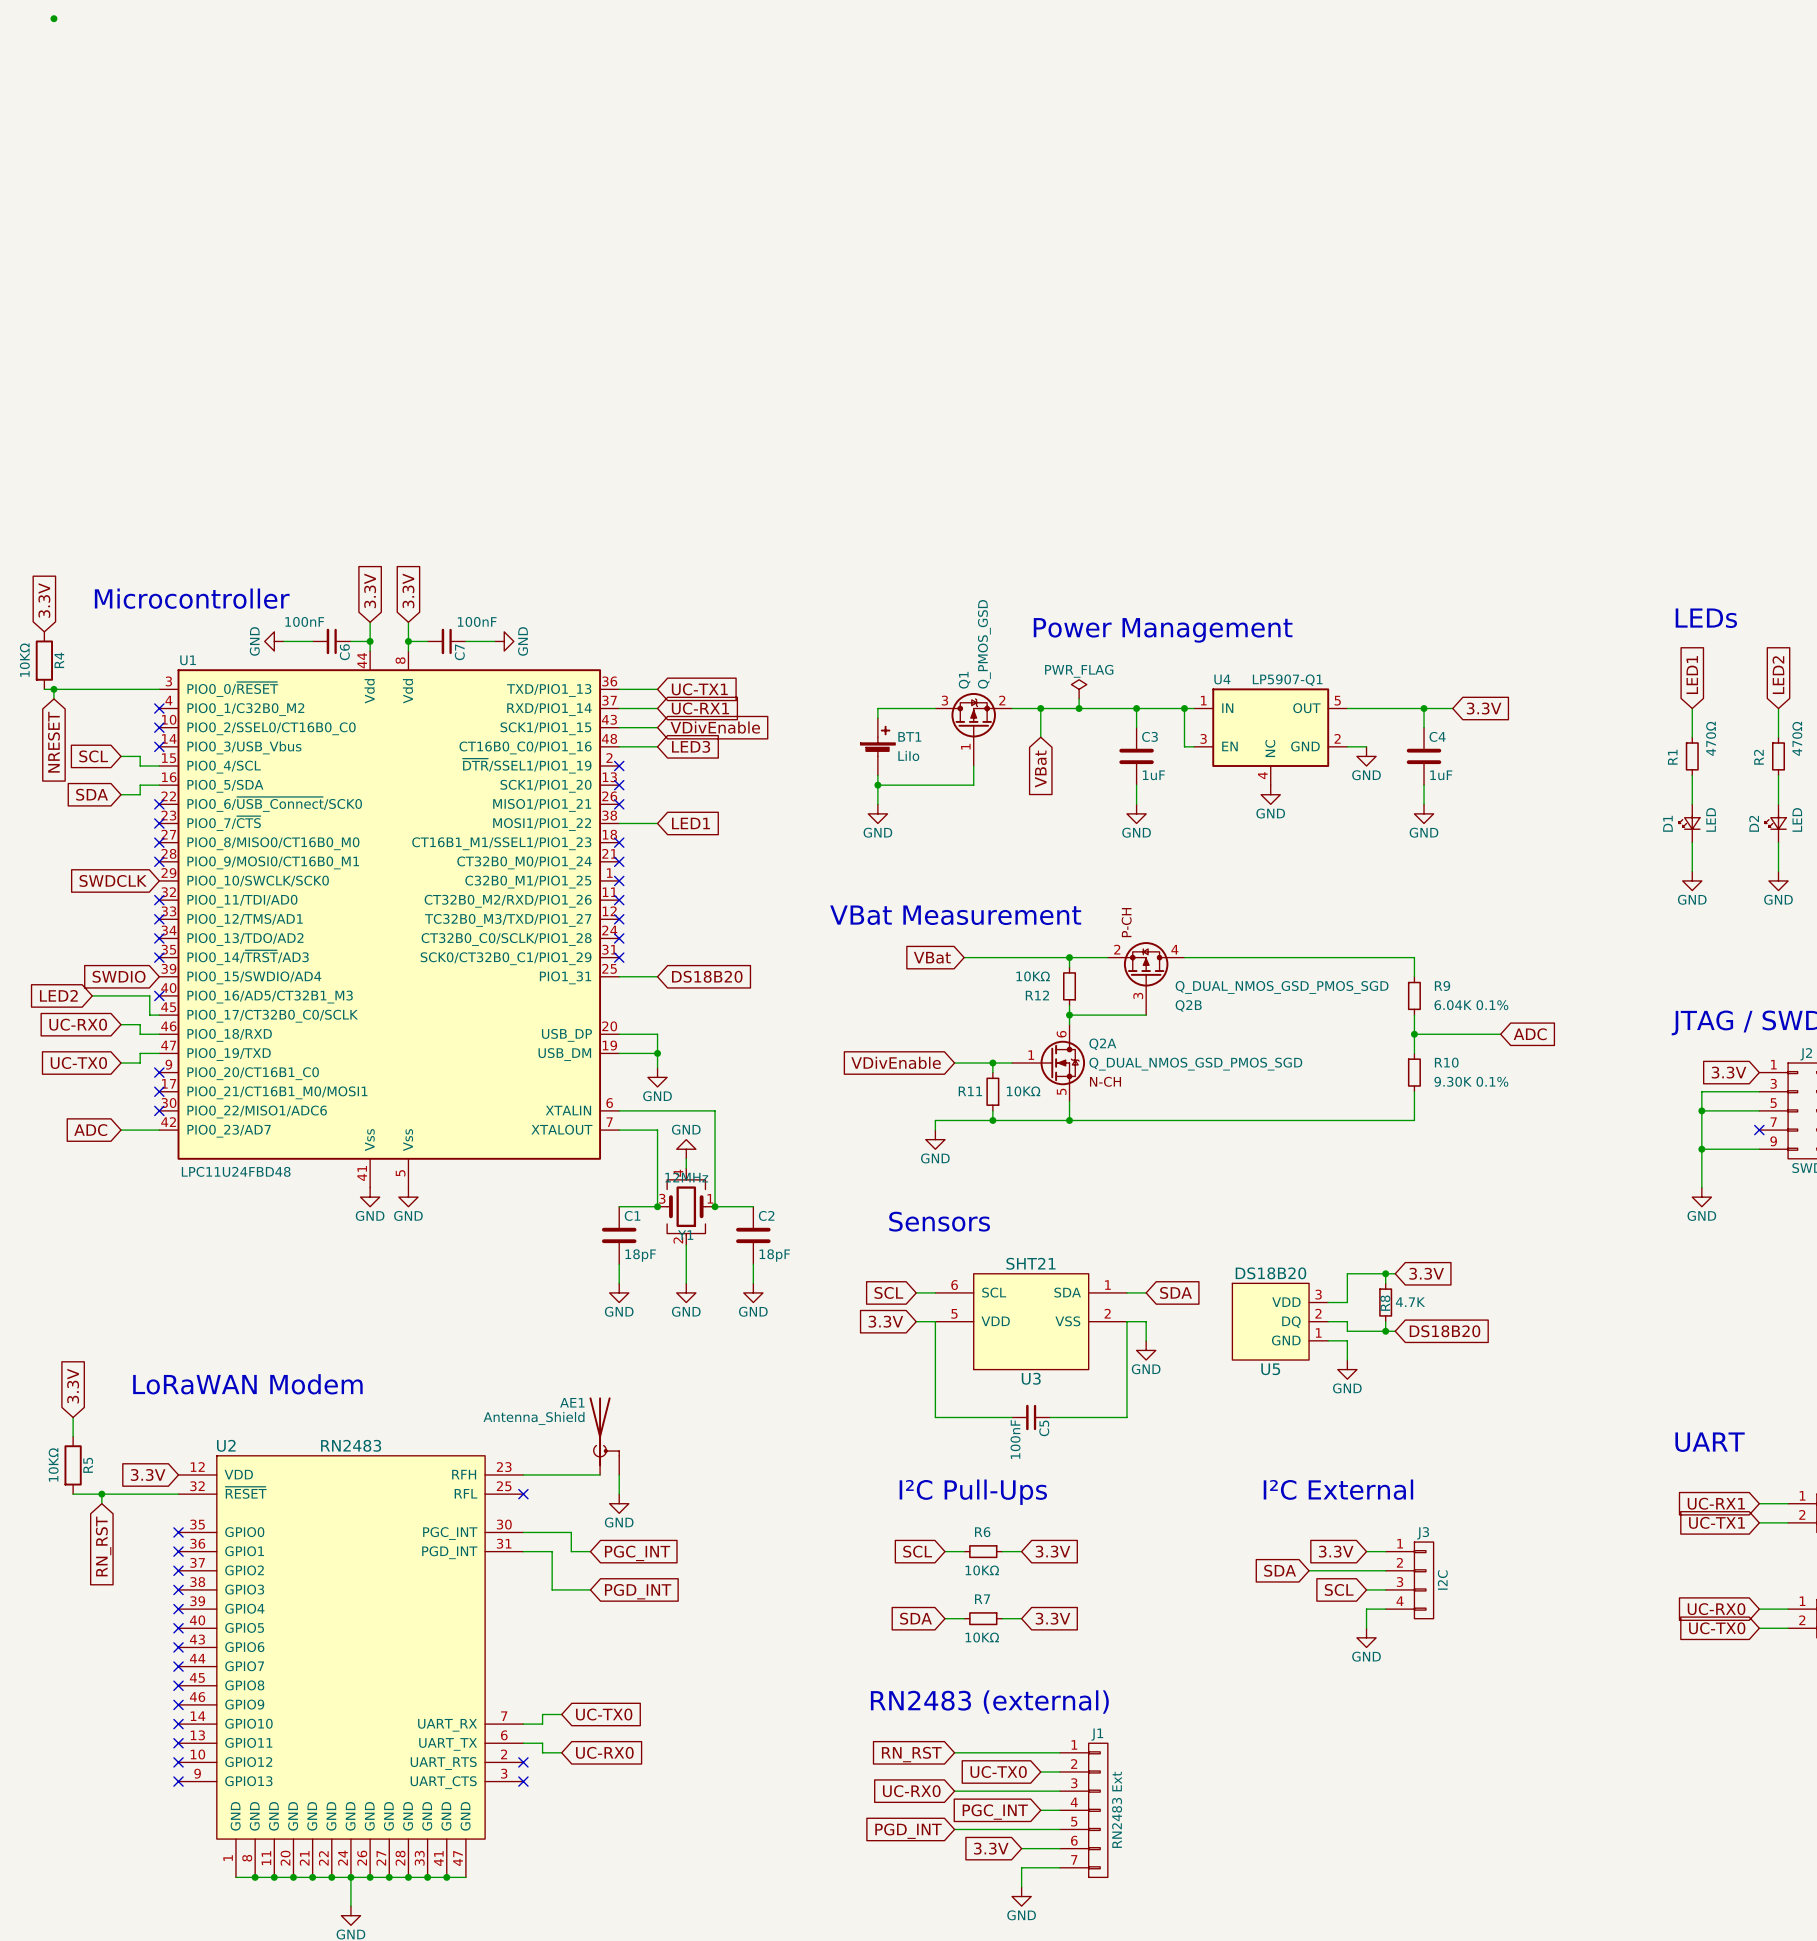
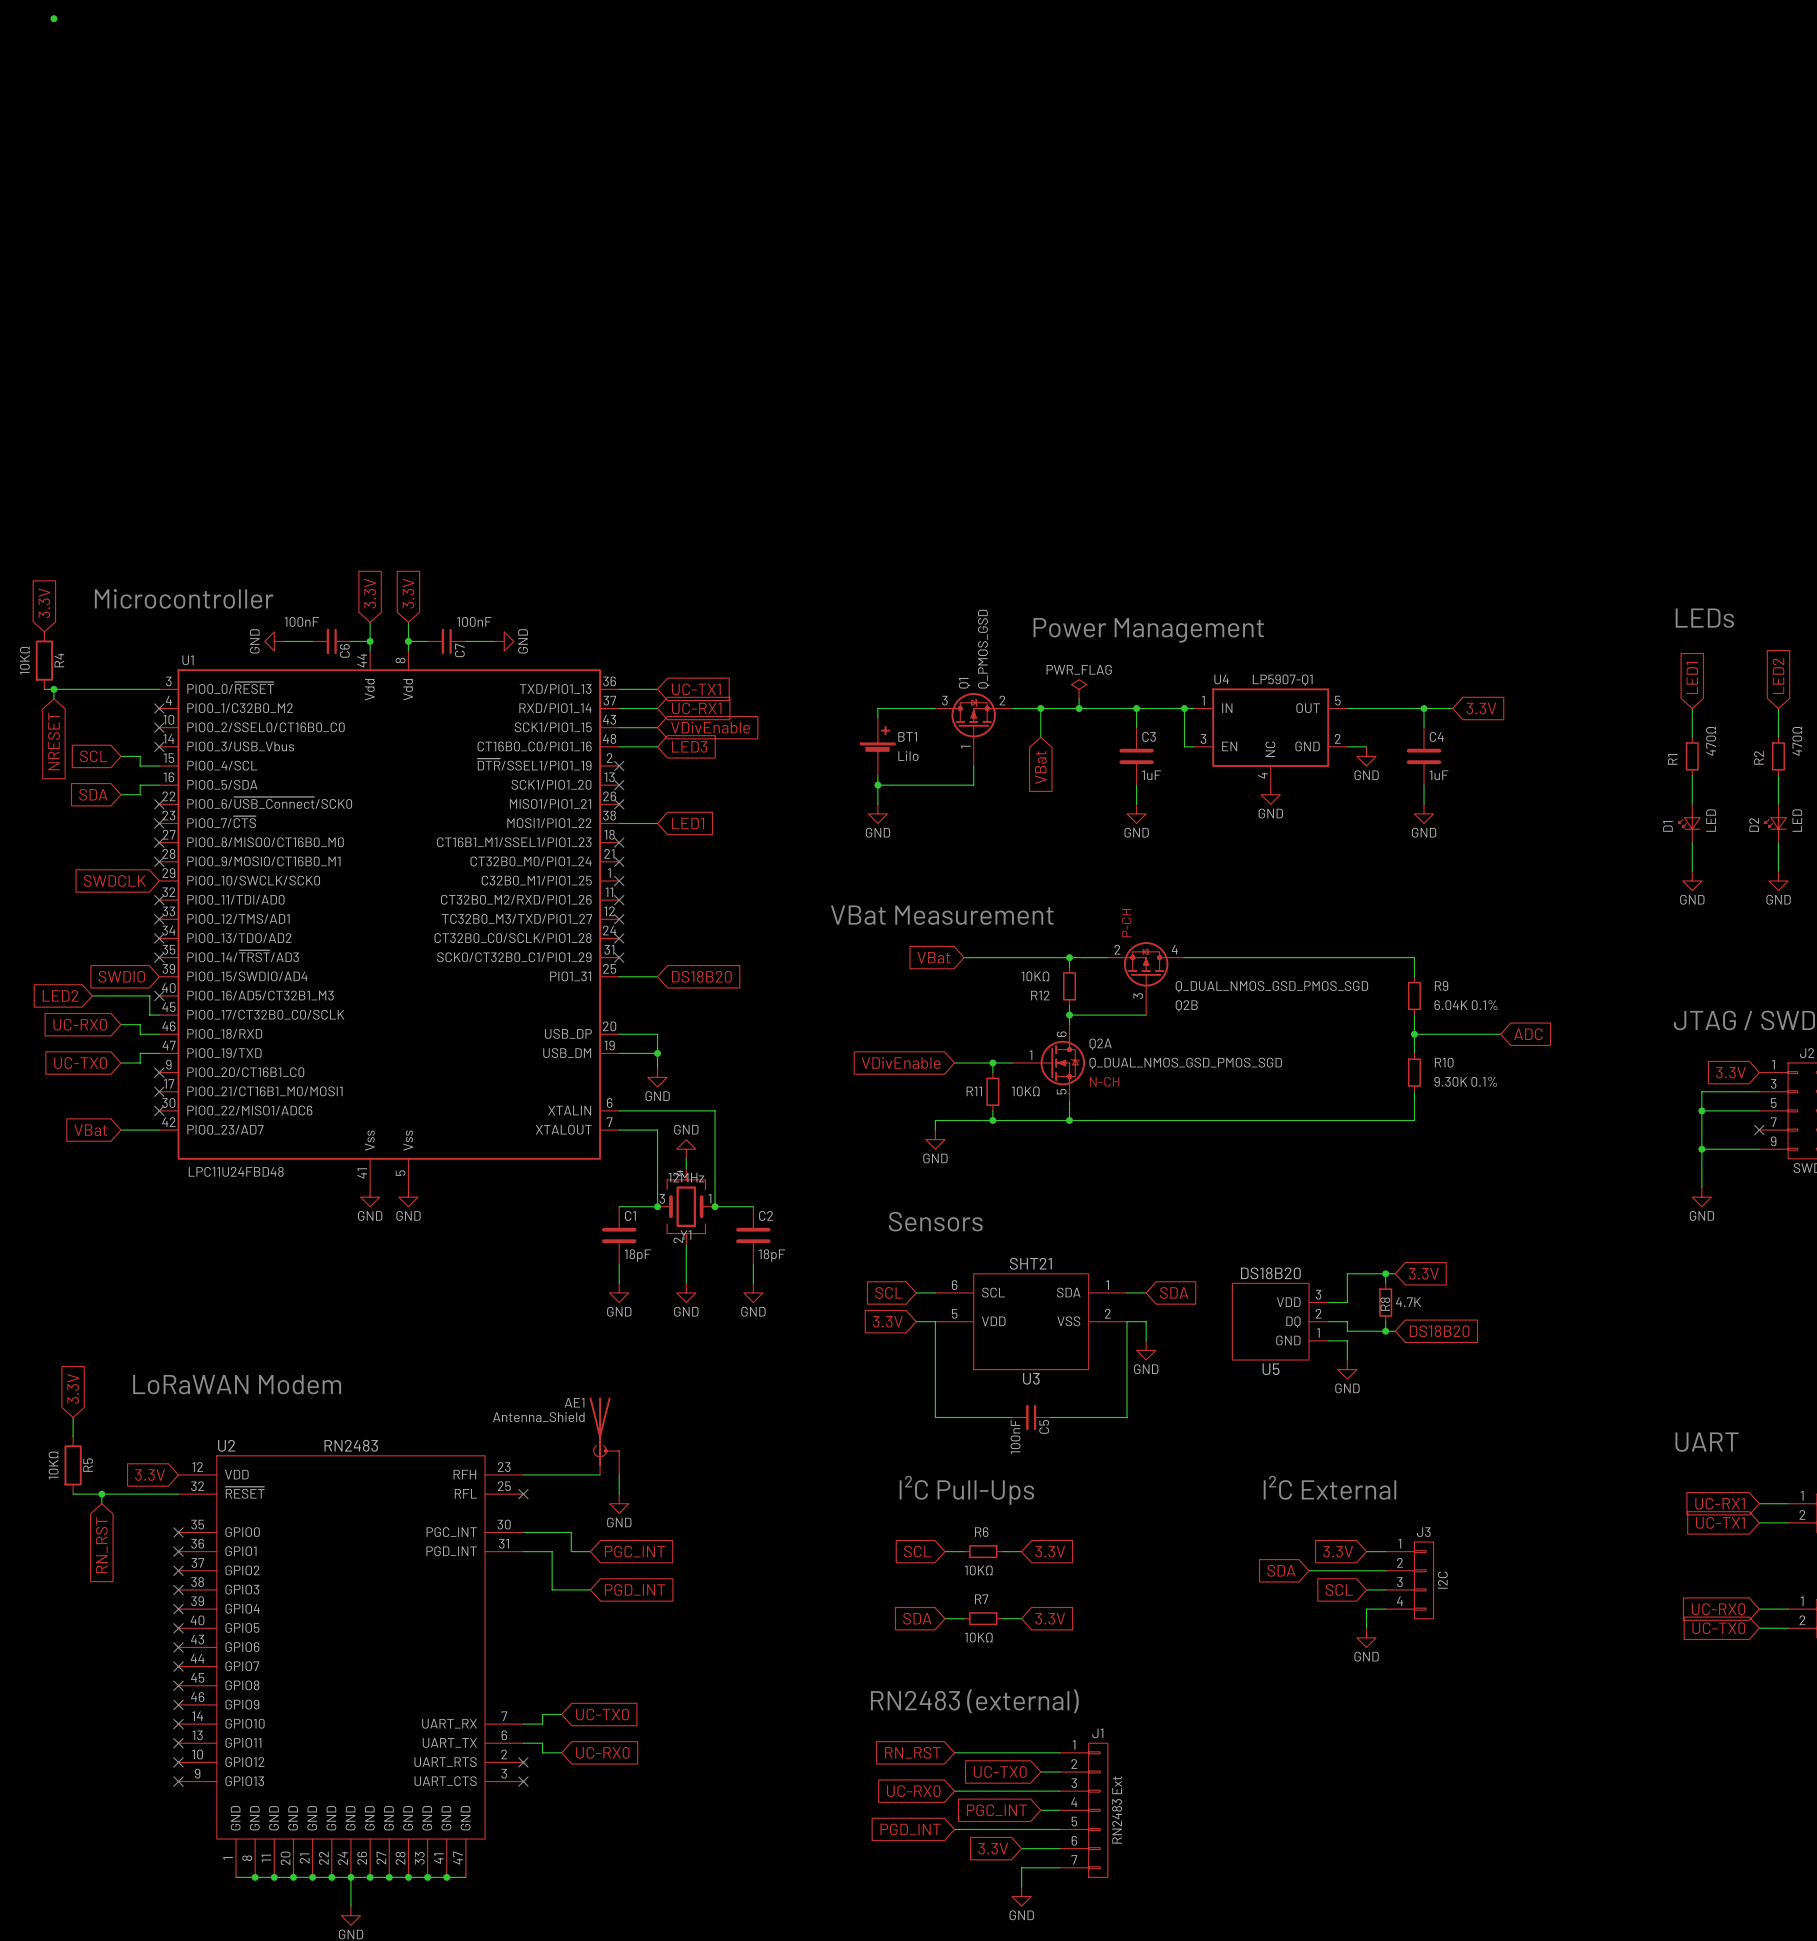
global label: ADC (90, 1130) -> VBat (90, 1130)

